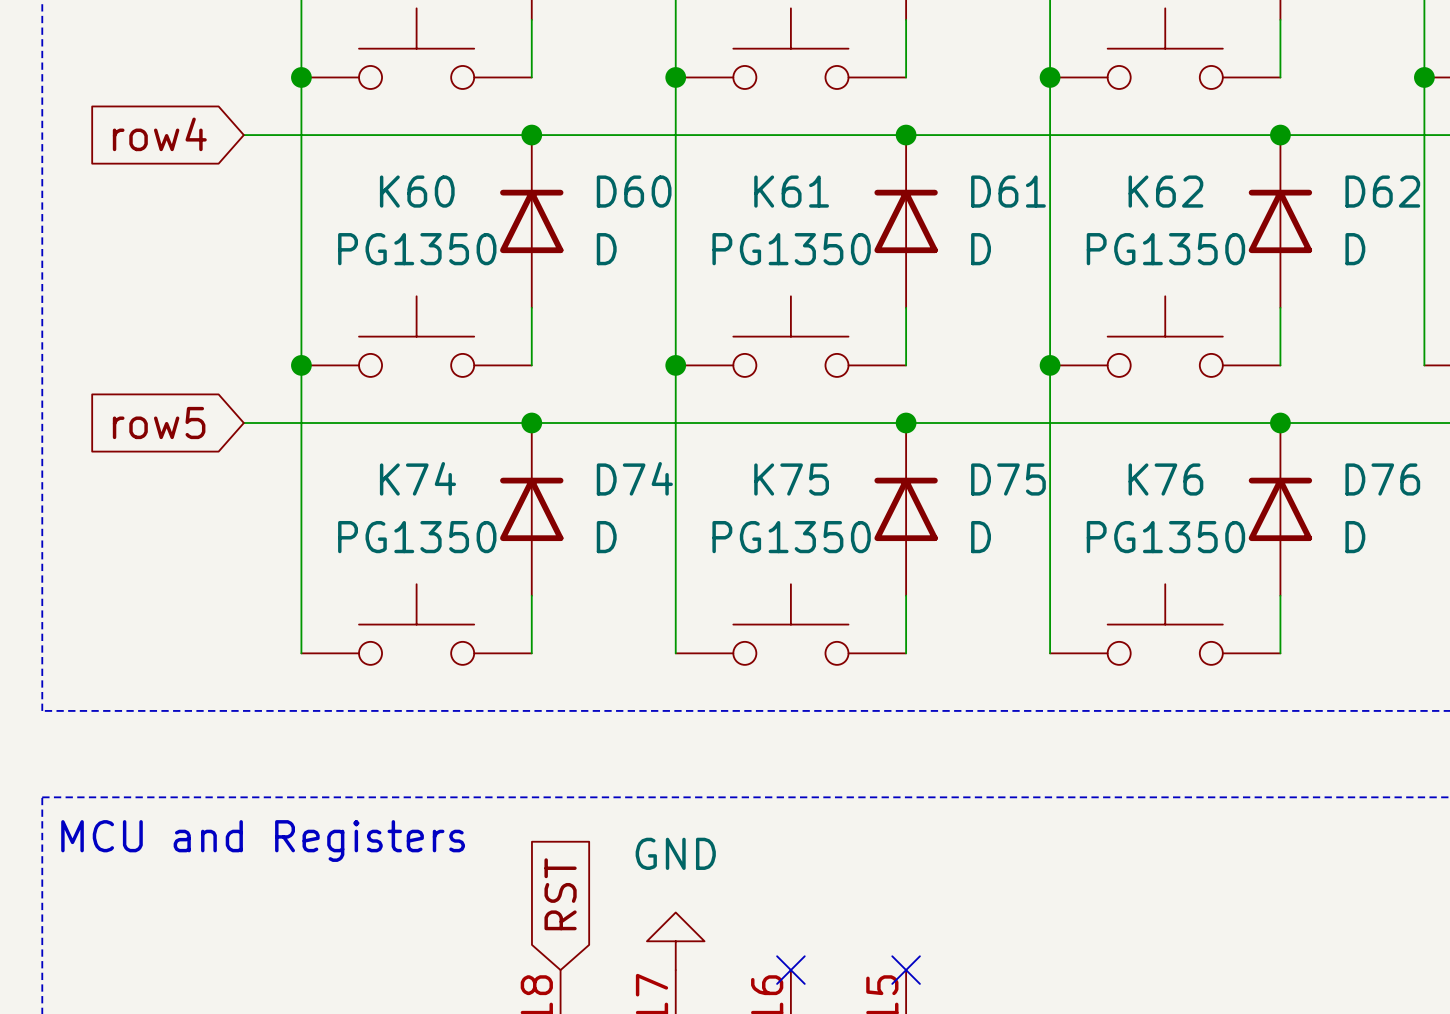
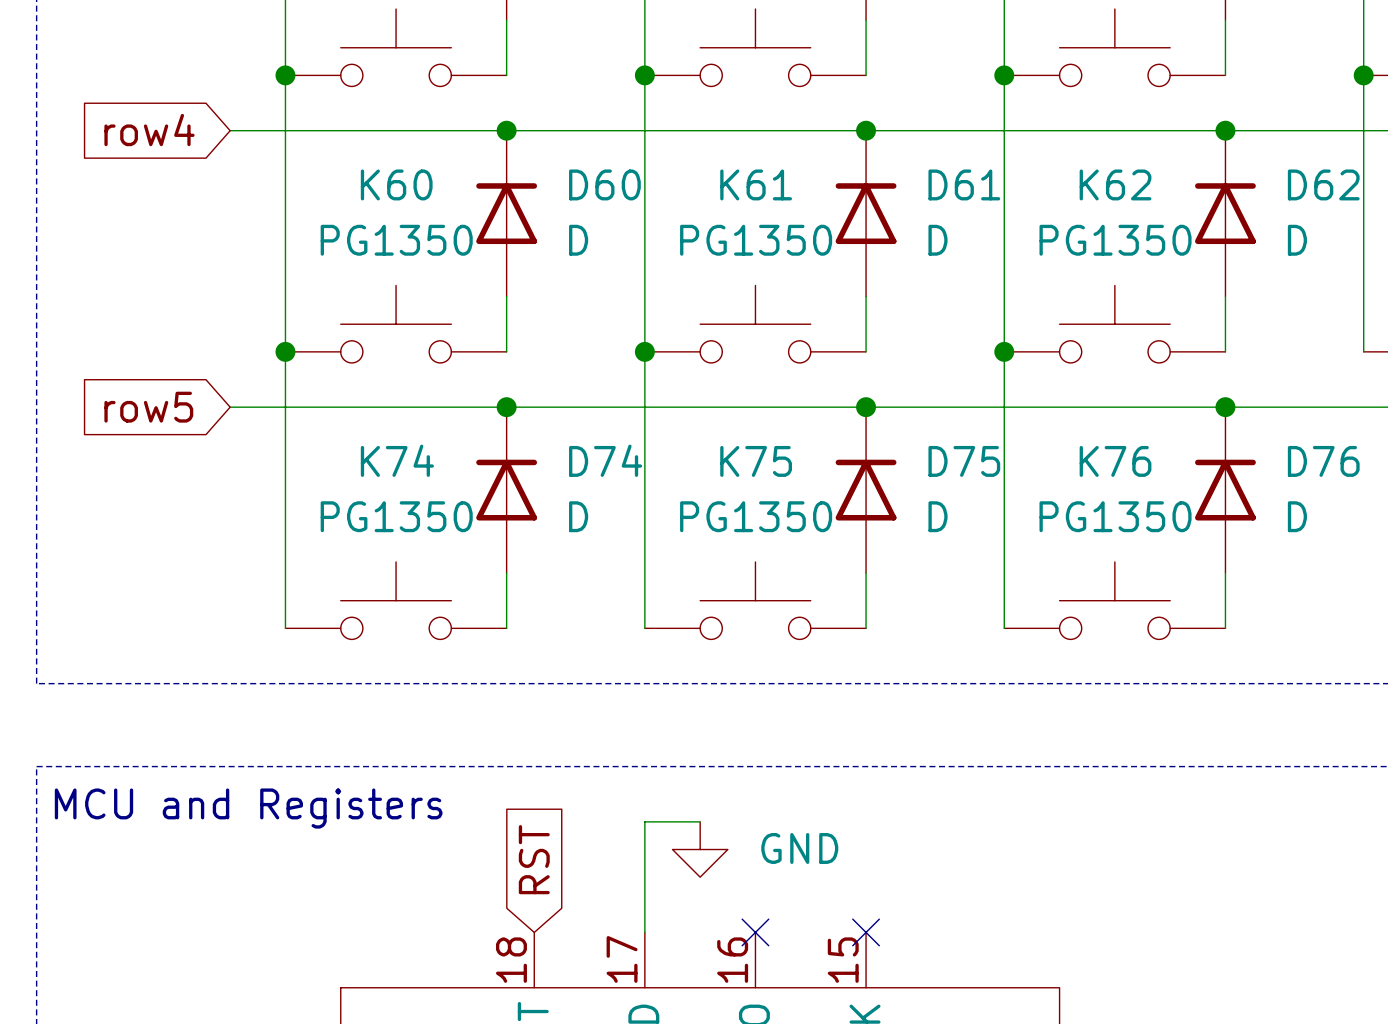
power symbol text position: GND (675, 853) -> GND (799, 848)
wire: none -> (700, 821) (644, 821) (644, 932)
power symbol rotation: 0° (675, 941) -> 180° (700, 849)
power symbol position: GND (675, 941) -> GND (700, 849)

